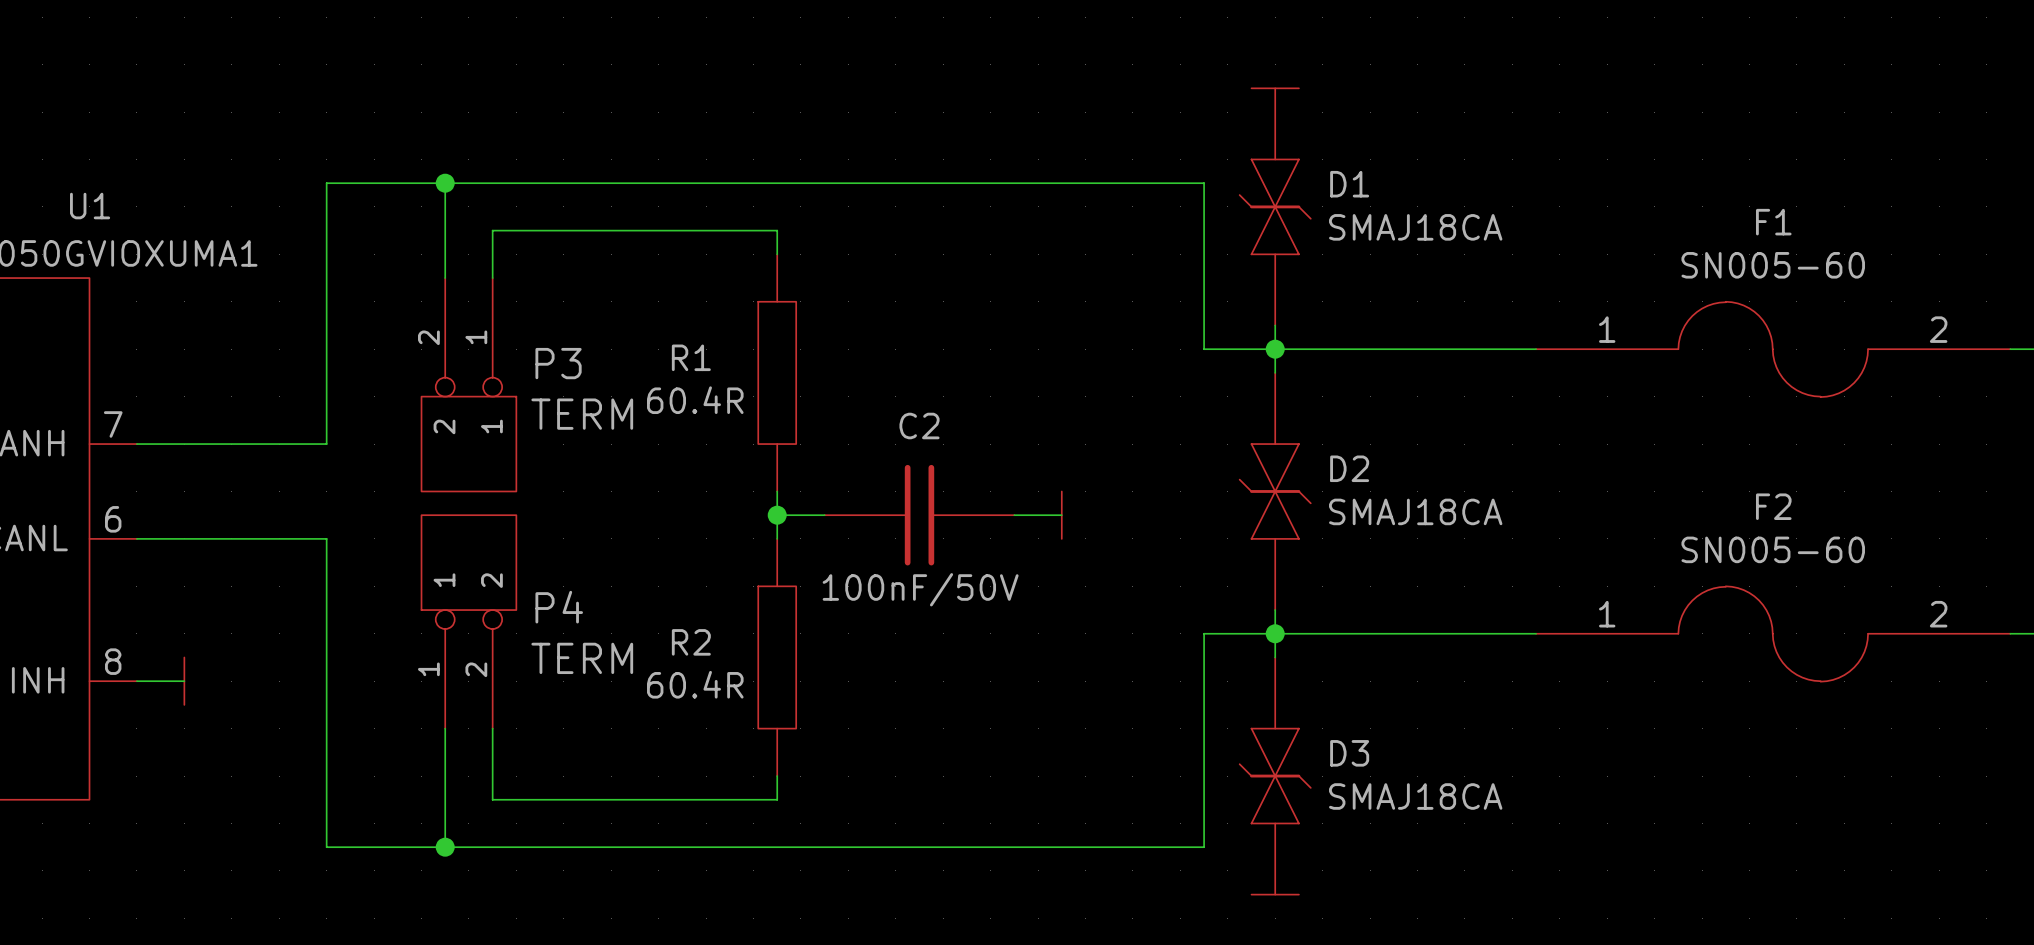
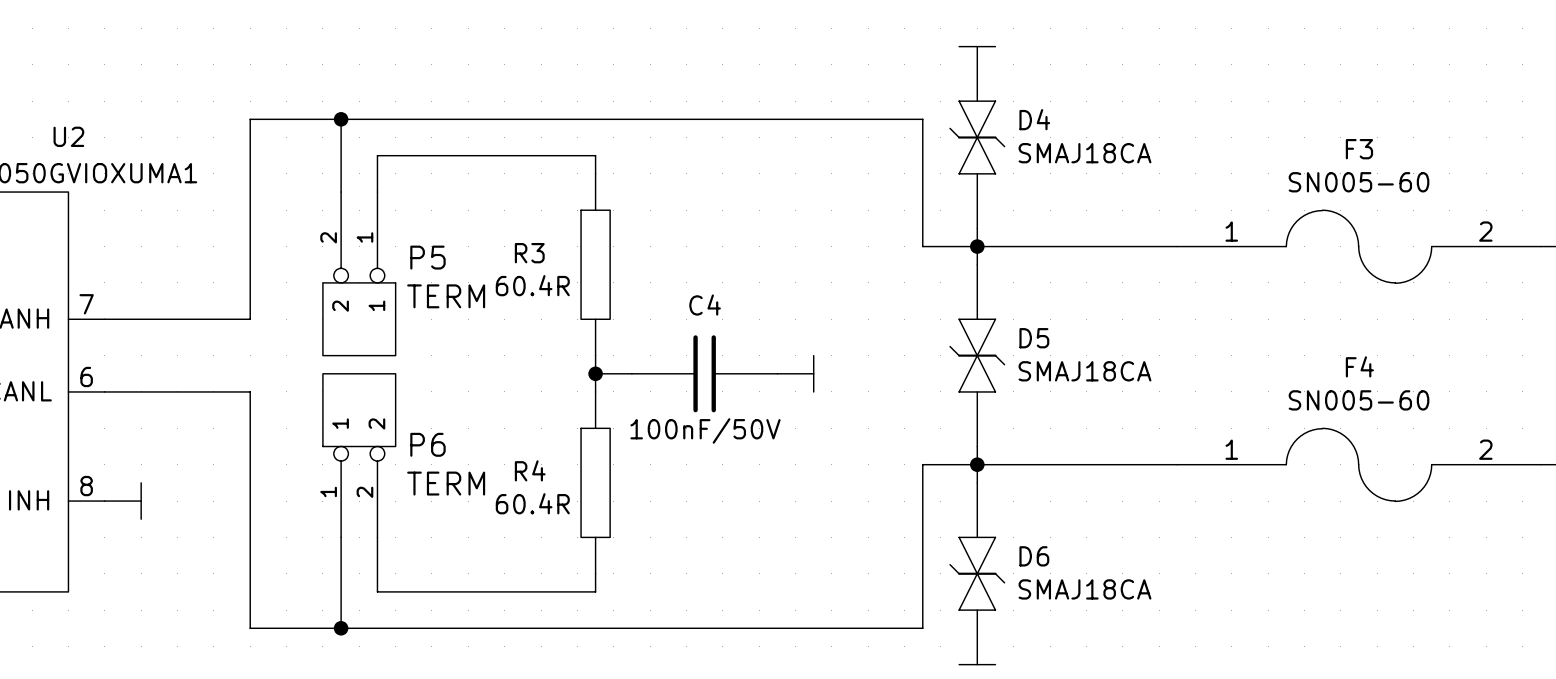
D1 name: D1 (1349, 184) -> D4 (1034, 119)
U1 name: U1 (90, 206) -> U2 (68, 136)
F1 name: F1 (1773, 222) -> F3 (1359, 149)
R1 name: R1 (691, 357) -> R3 (529, 253)
P3 name: P3 (558, 363) -> P5 (427, 257)
C2 name: C2 (919, 426) -> C4 (705, 305)
D2 name: D2 (1349, 468) -> D5 (1034, 338)
F2 name: F2 (1773, 506) -> F4 (1359, 366)
P4 name: P4 (559, 607) -> P6 (427, 444)
R2 name: R2 (691, 642) -> R4 (530, 470)
D3 name: D3 (1349, 753) -> D6 (1034, 556)

